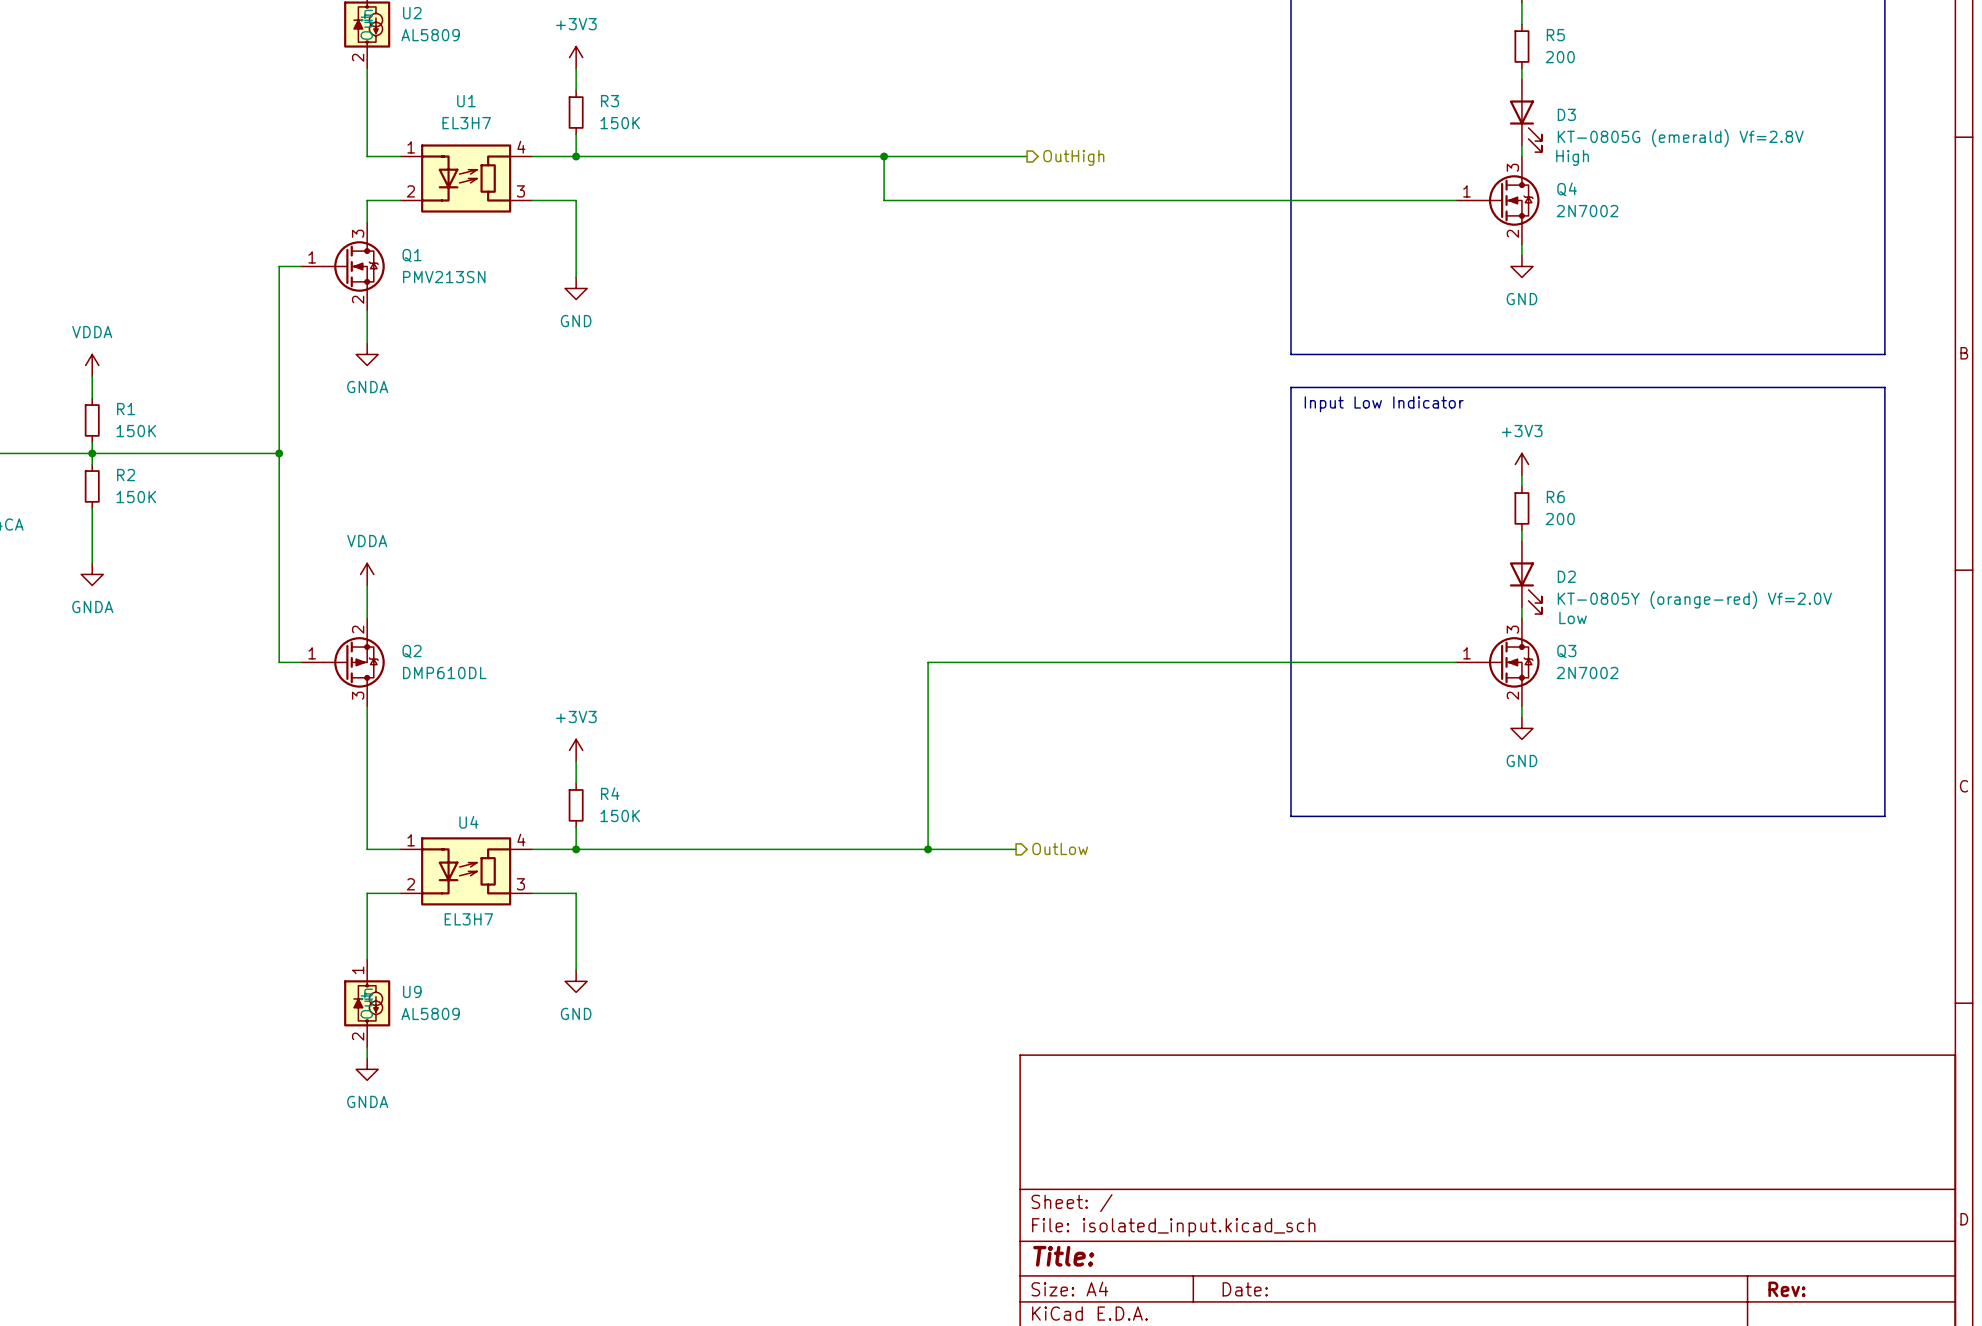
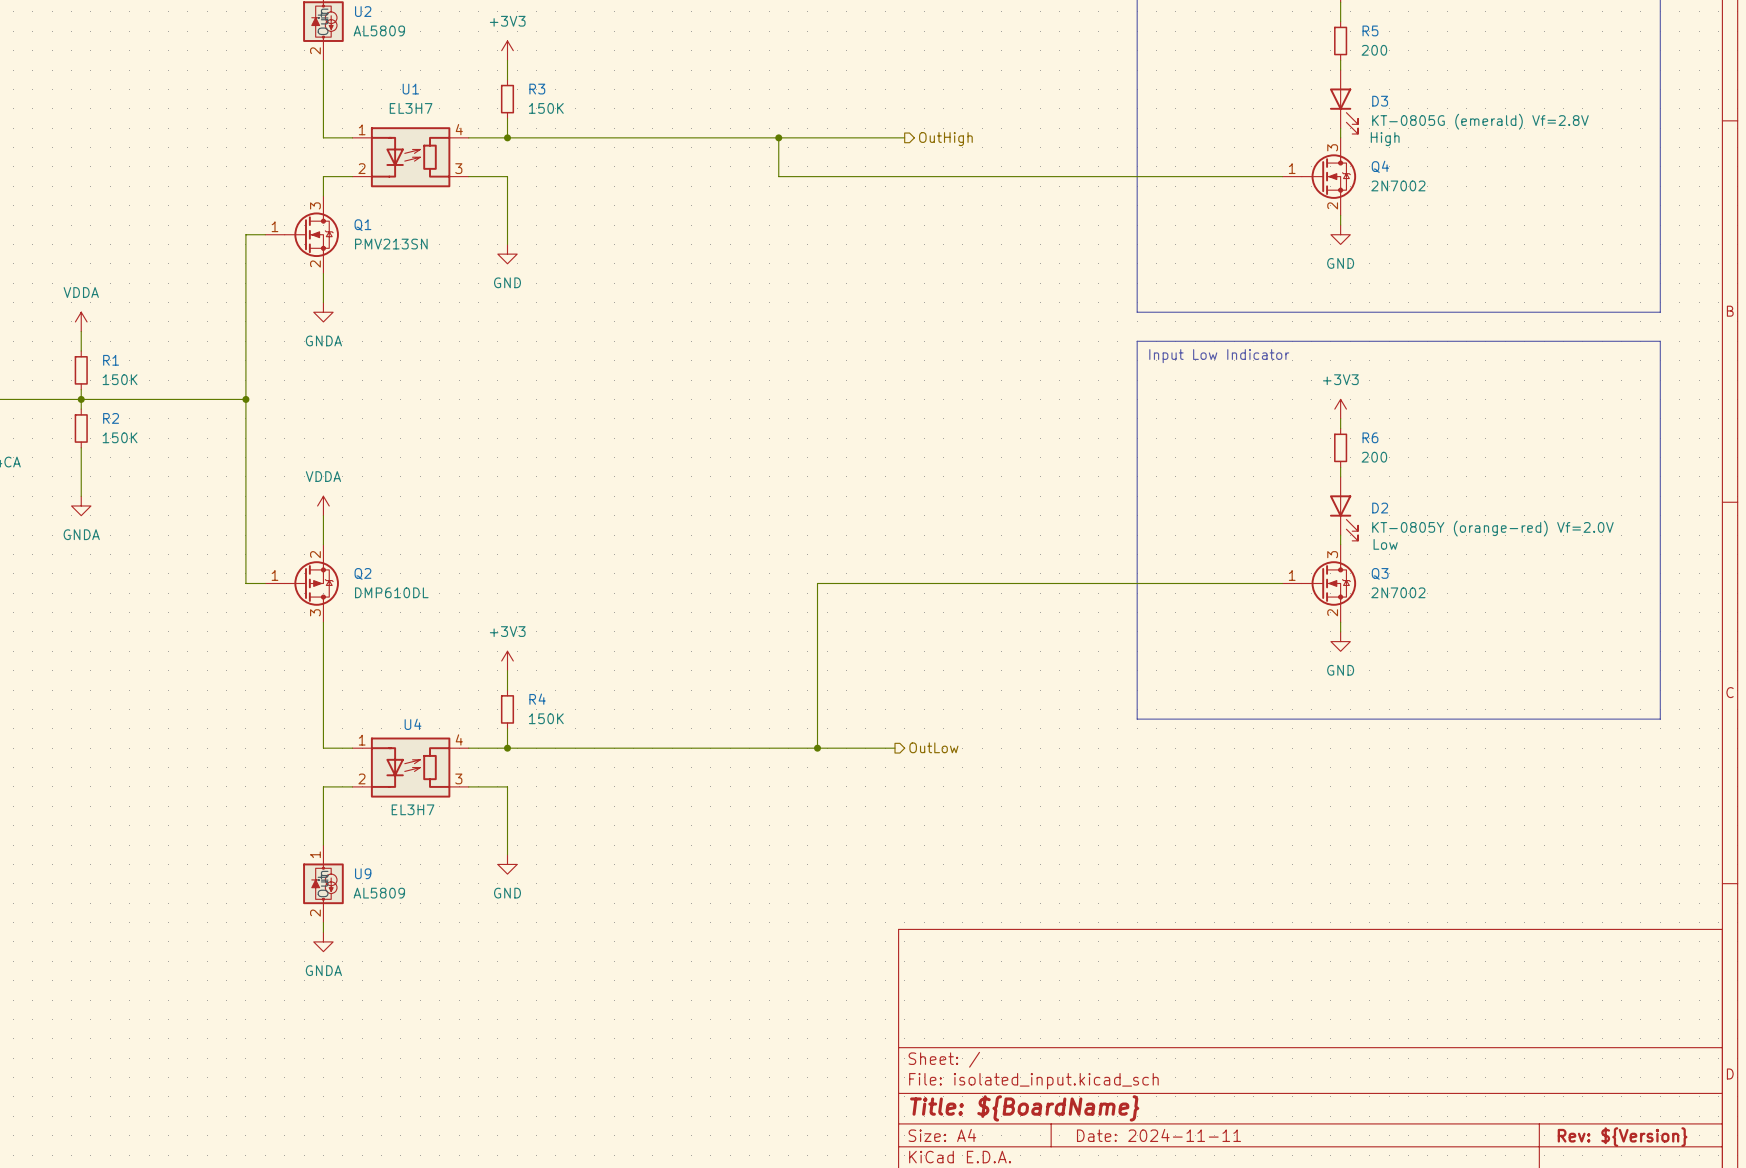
title block: Title: (1063, 1256) -> Title: ${BoardName} (1024, 1108)
title block: Date: (1245, 1289) -> Date: 2024-11-11 (1158, 1135)
title block: Rev: (1786, 1289) -> Rev: ${Version} (1622, 1137)

